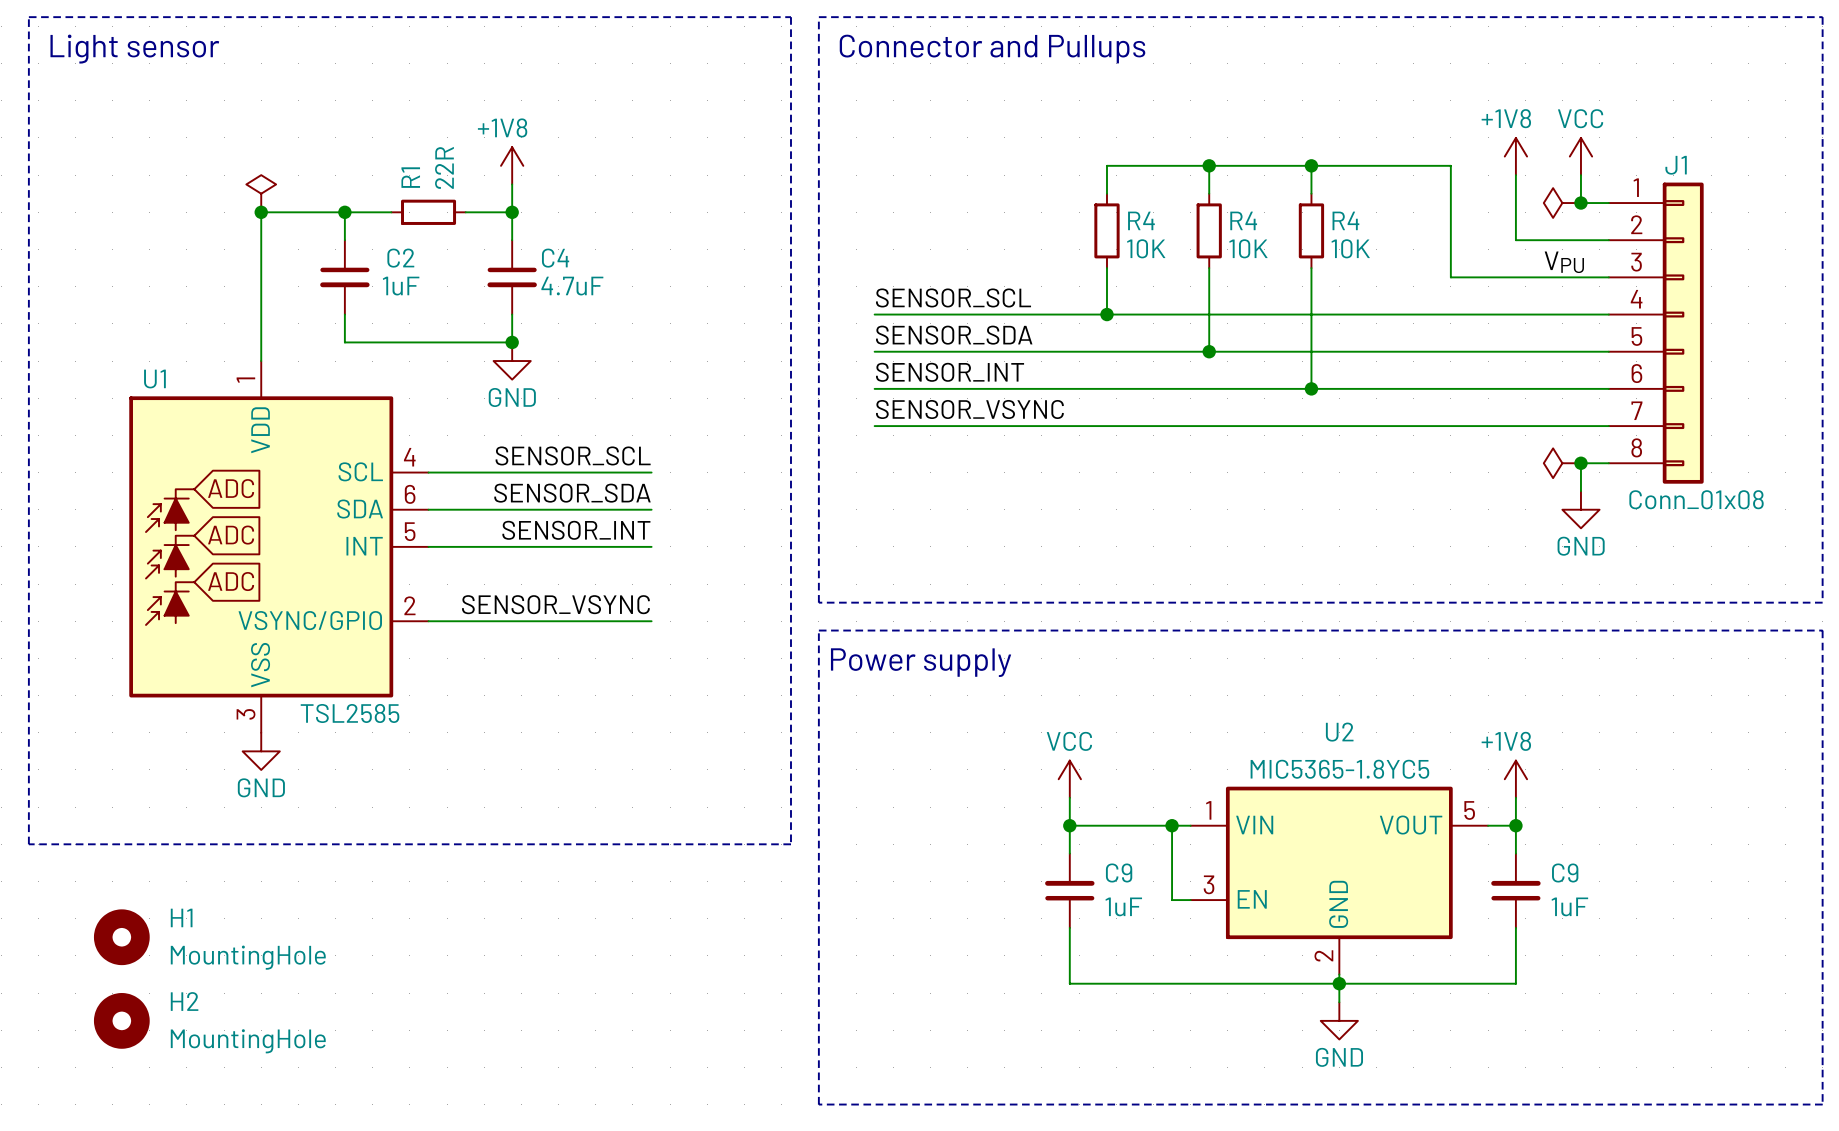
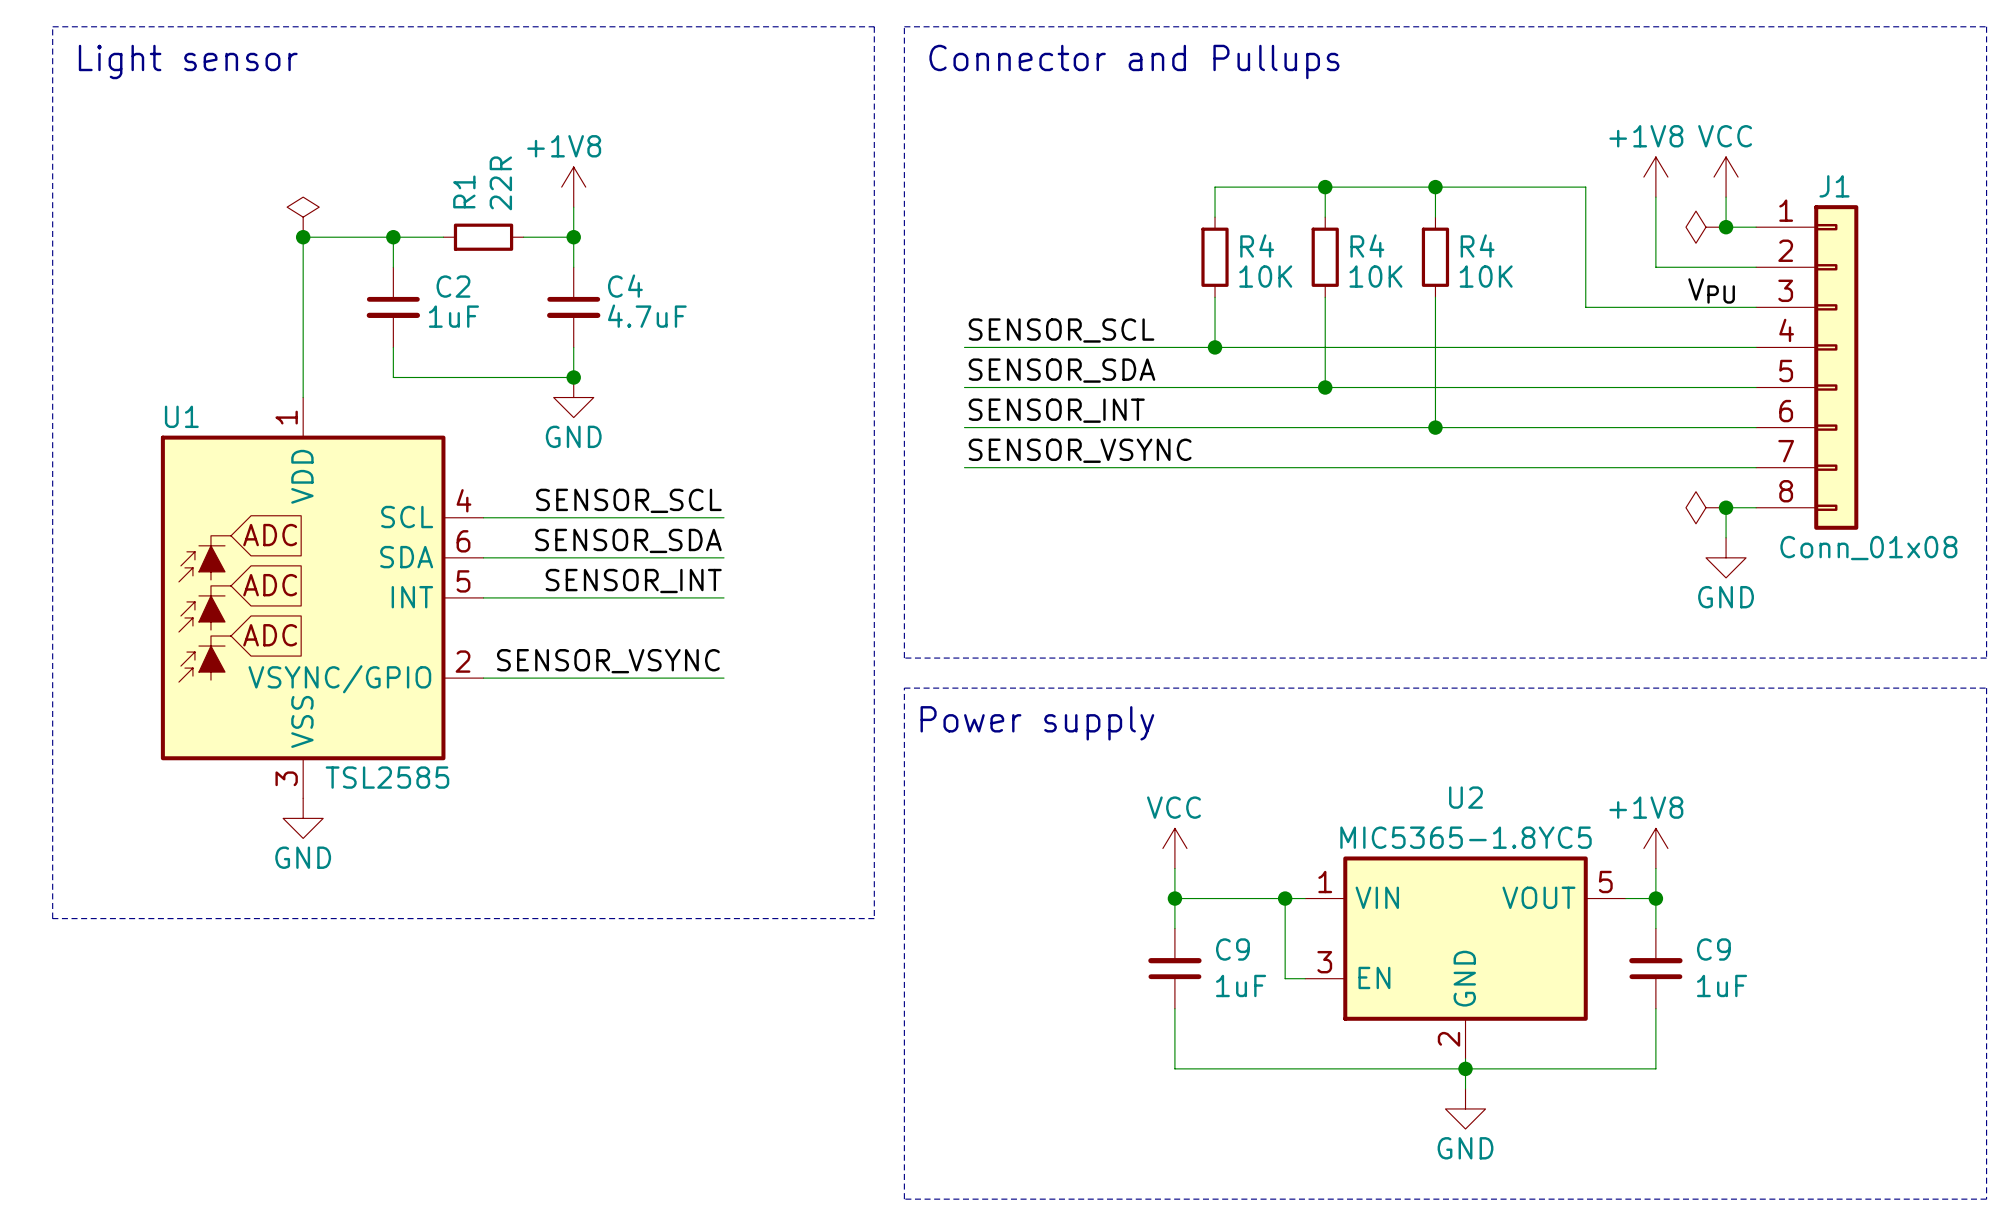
H1: MountingHole (121, 937) -> none
H2: MountingHole (121, 1020) -> none

